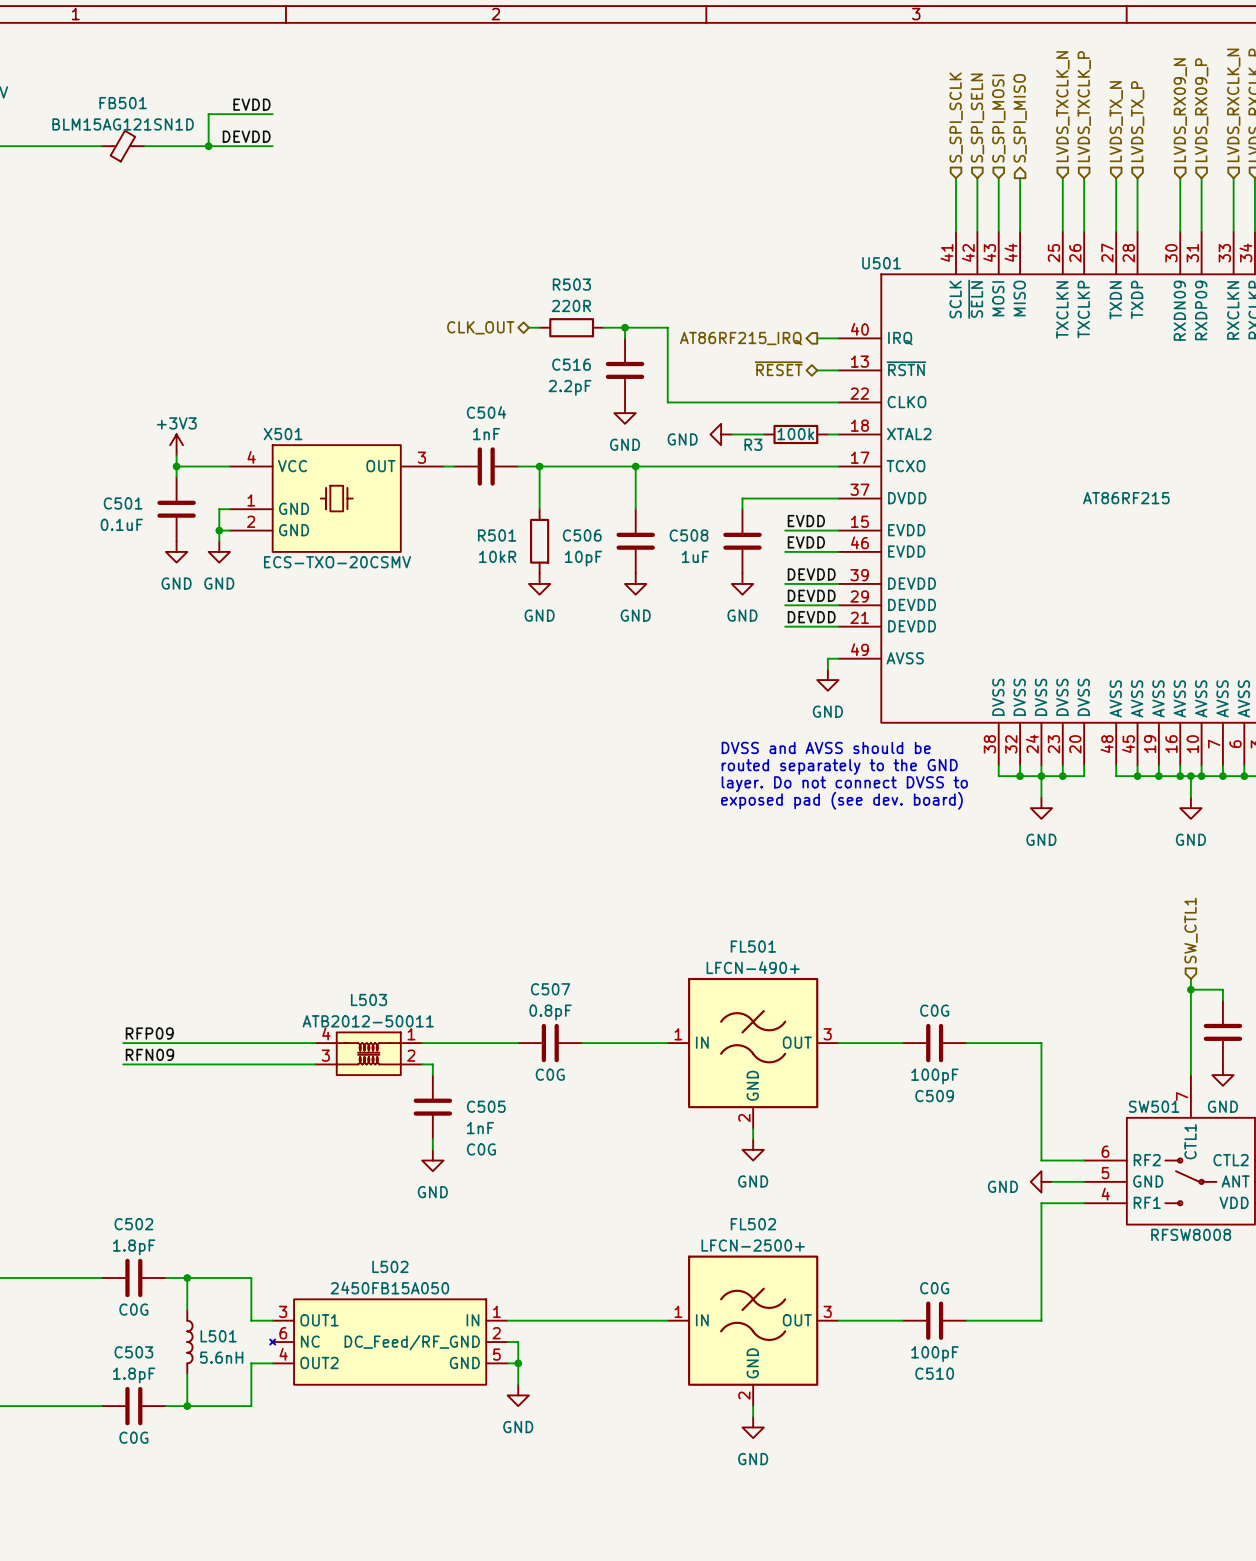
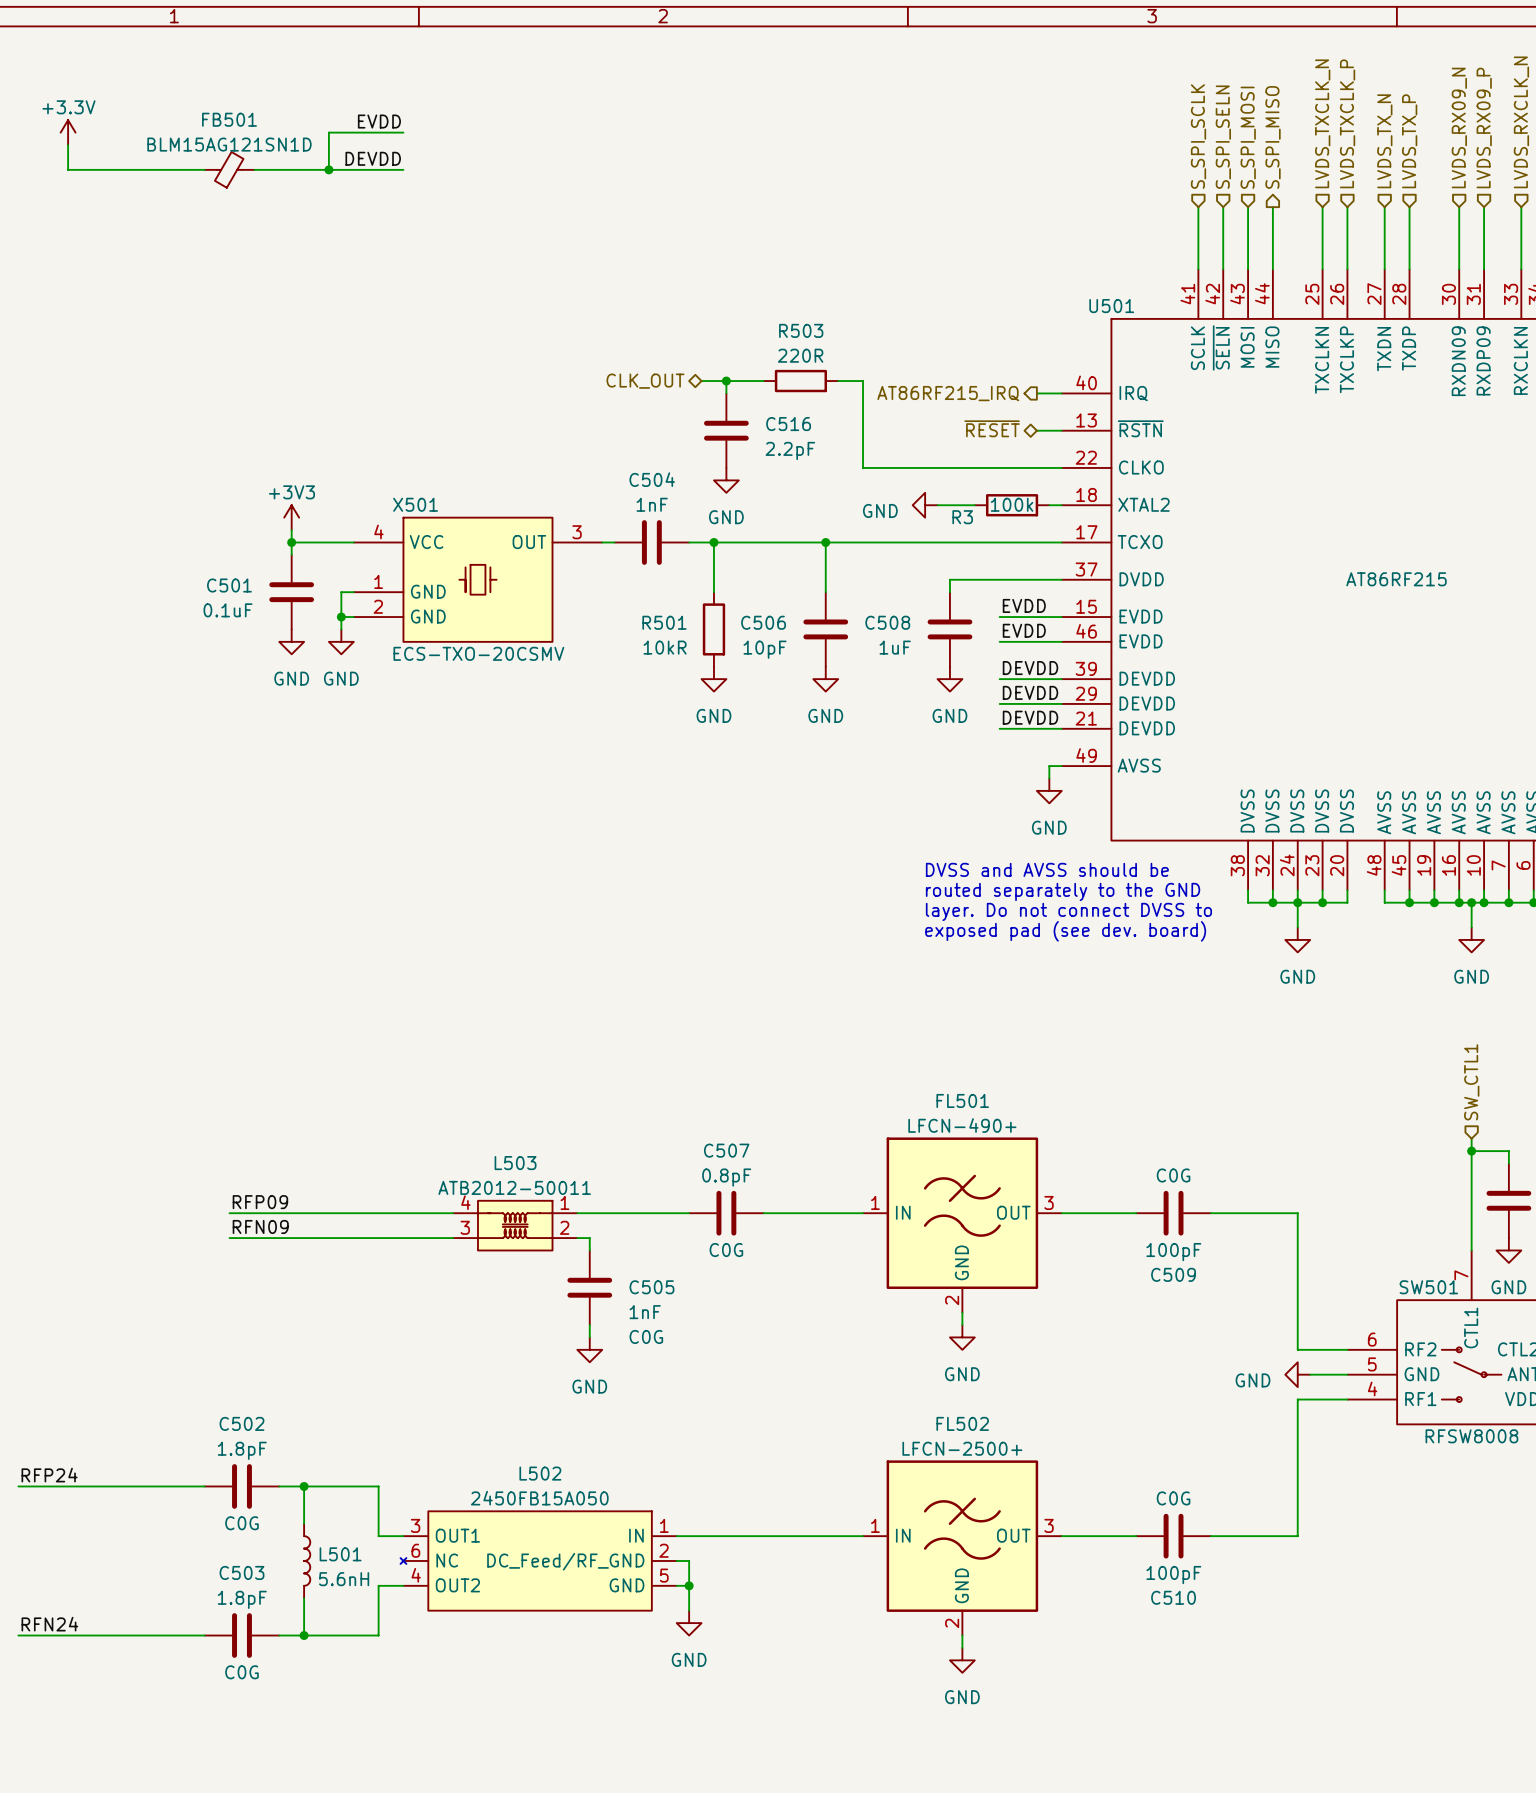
junction: none -> (726, 381)
R503 position: (571, 327) -> (800, 381)
wire: (603, 327) (646, 327) -> (713, 381) (763, 381)
junction: (625, 327) -> none
C516 name position: C516 (571, 364) -> C516 (788, 424)
C516 position: (625, 370) -> (726, 430)
C516 value position: 2.2pF (570, 387) -> 2.2pF (790, 450)
power symbol position: GND (625, 413) -> GND (726, 480)

